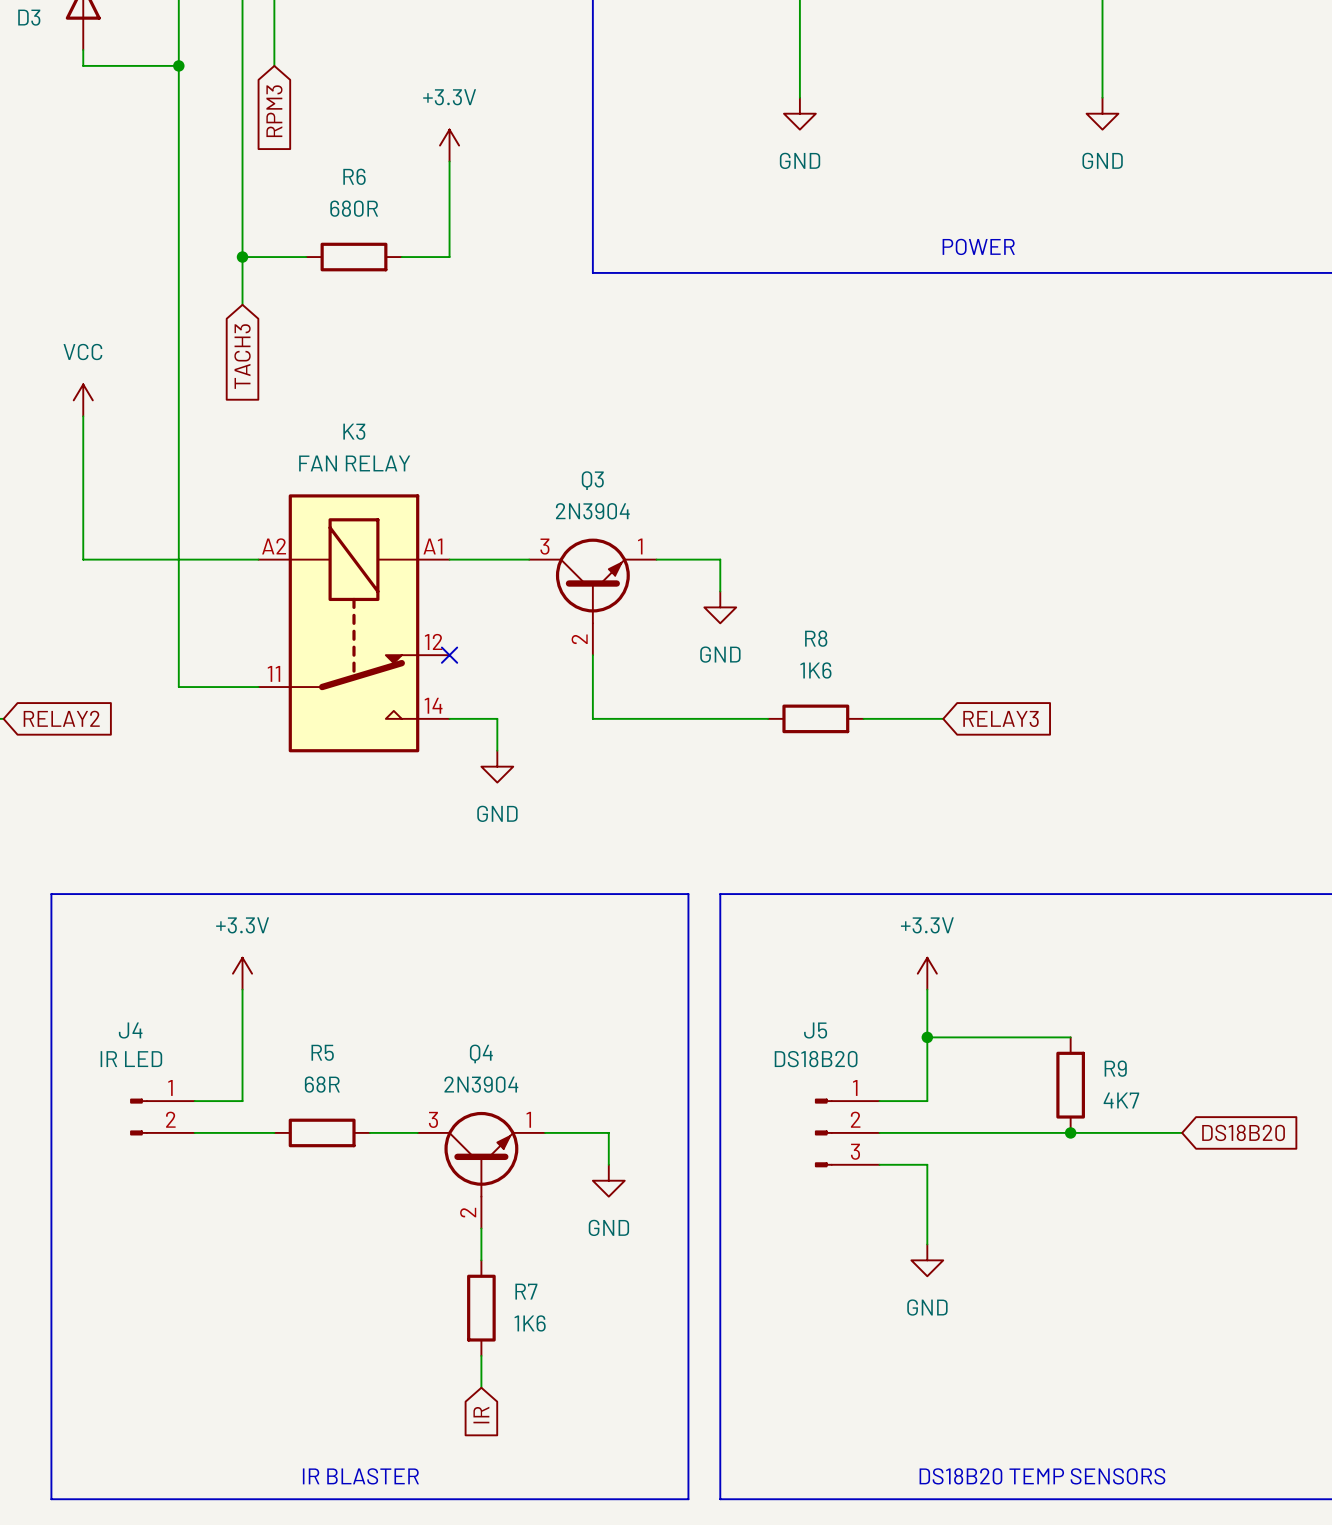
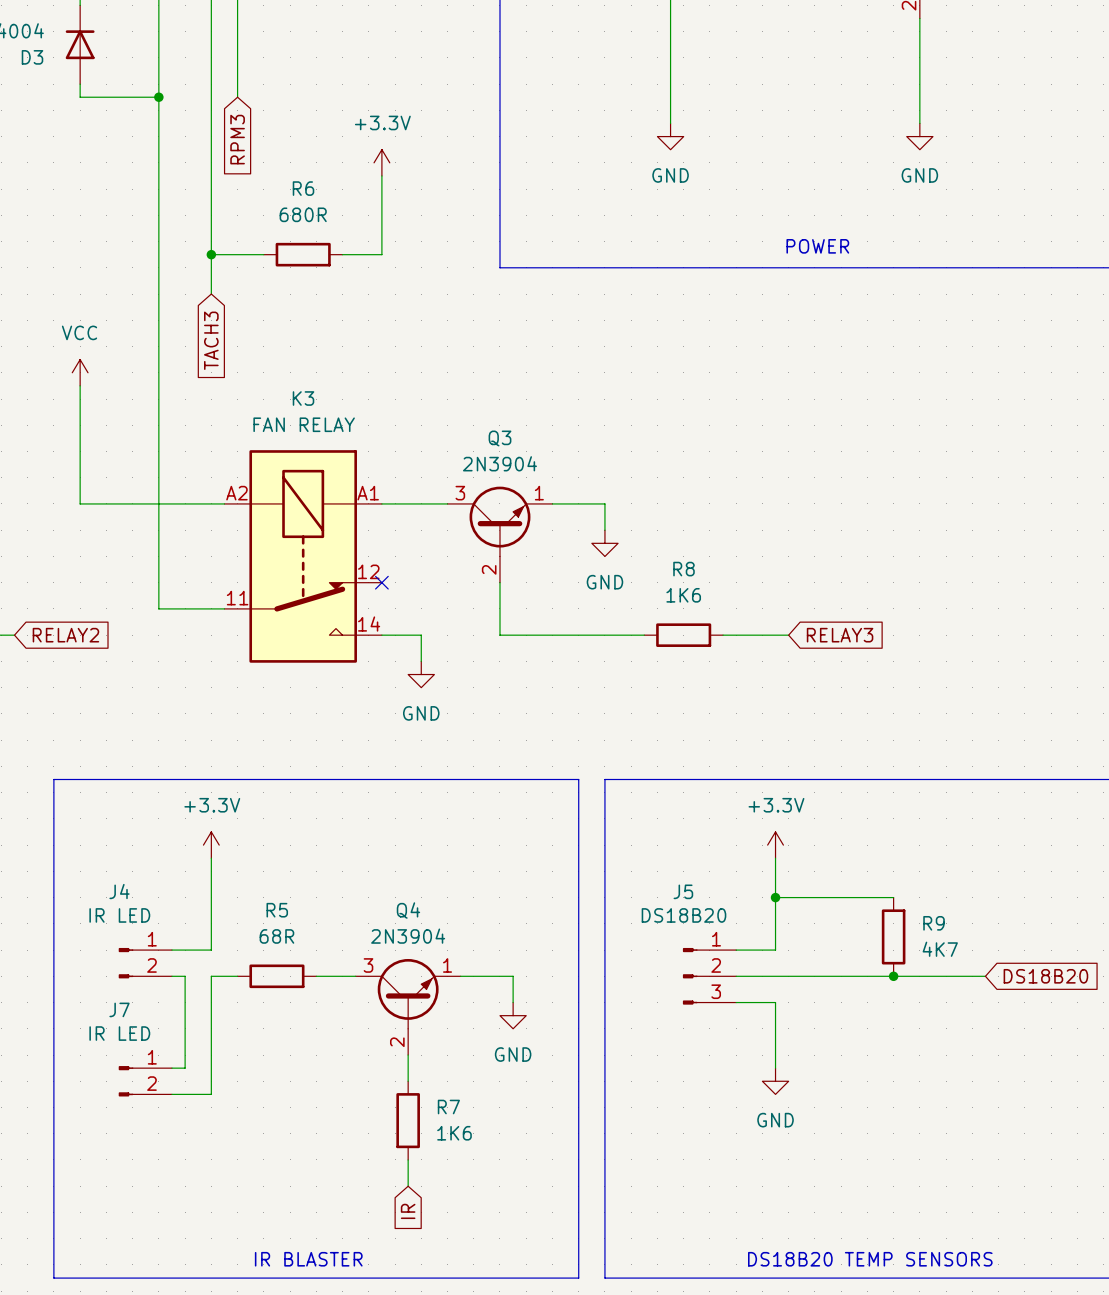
wire: (210, 1132) (242, 1132) -> (185, 976) (185, 1068) (171, 1068)
wire: none -> (211, 976) (211, 1094) (171, 1094)
J7: none -> IR LED (145, 1081)

